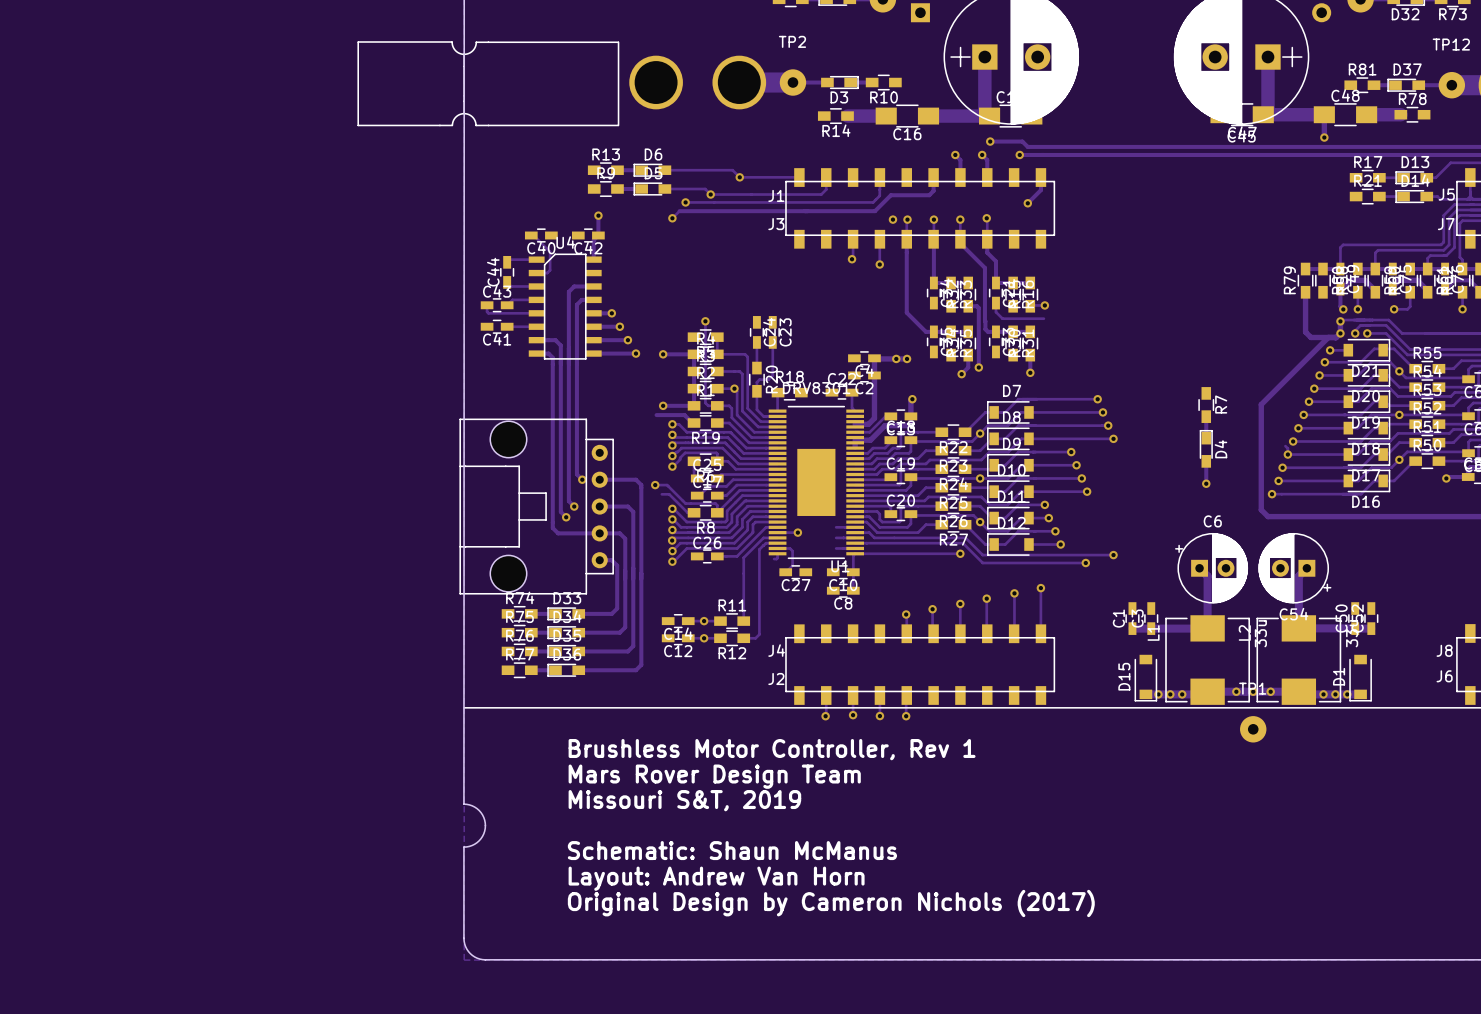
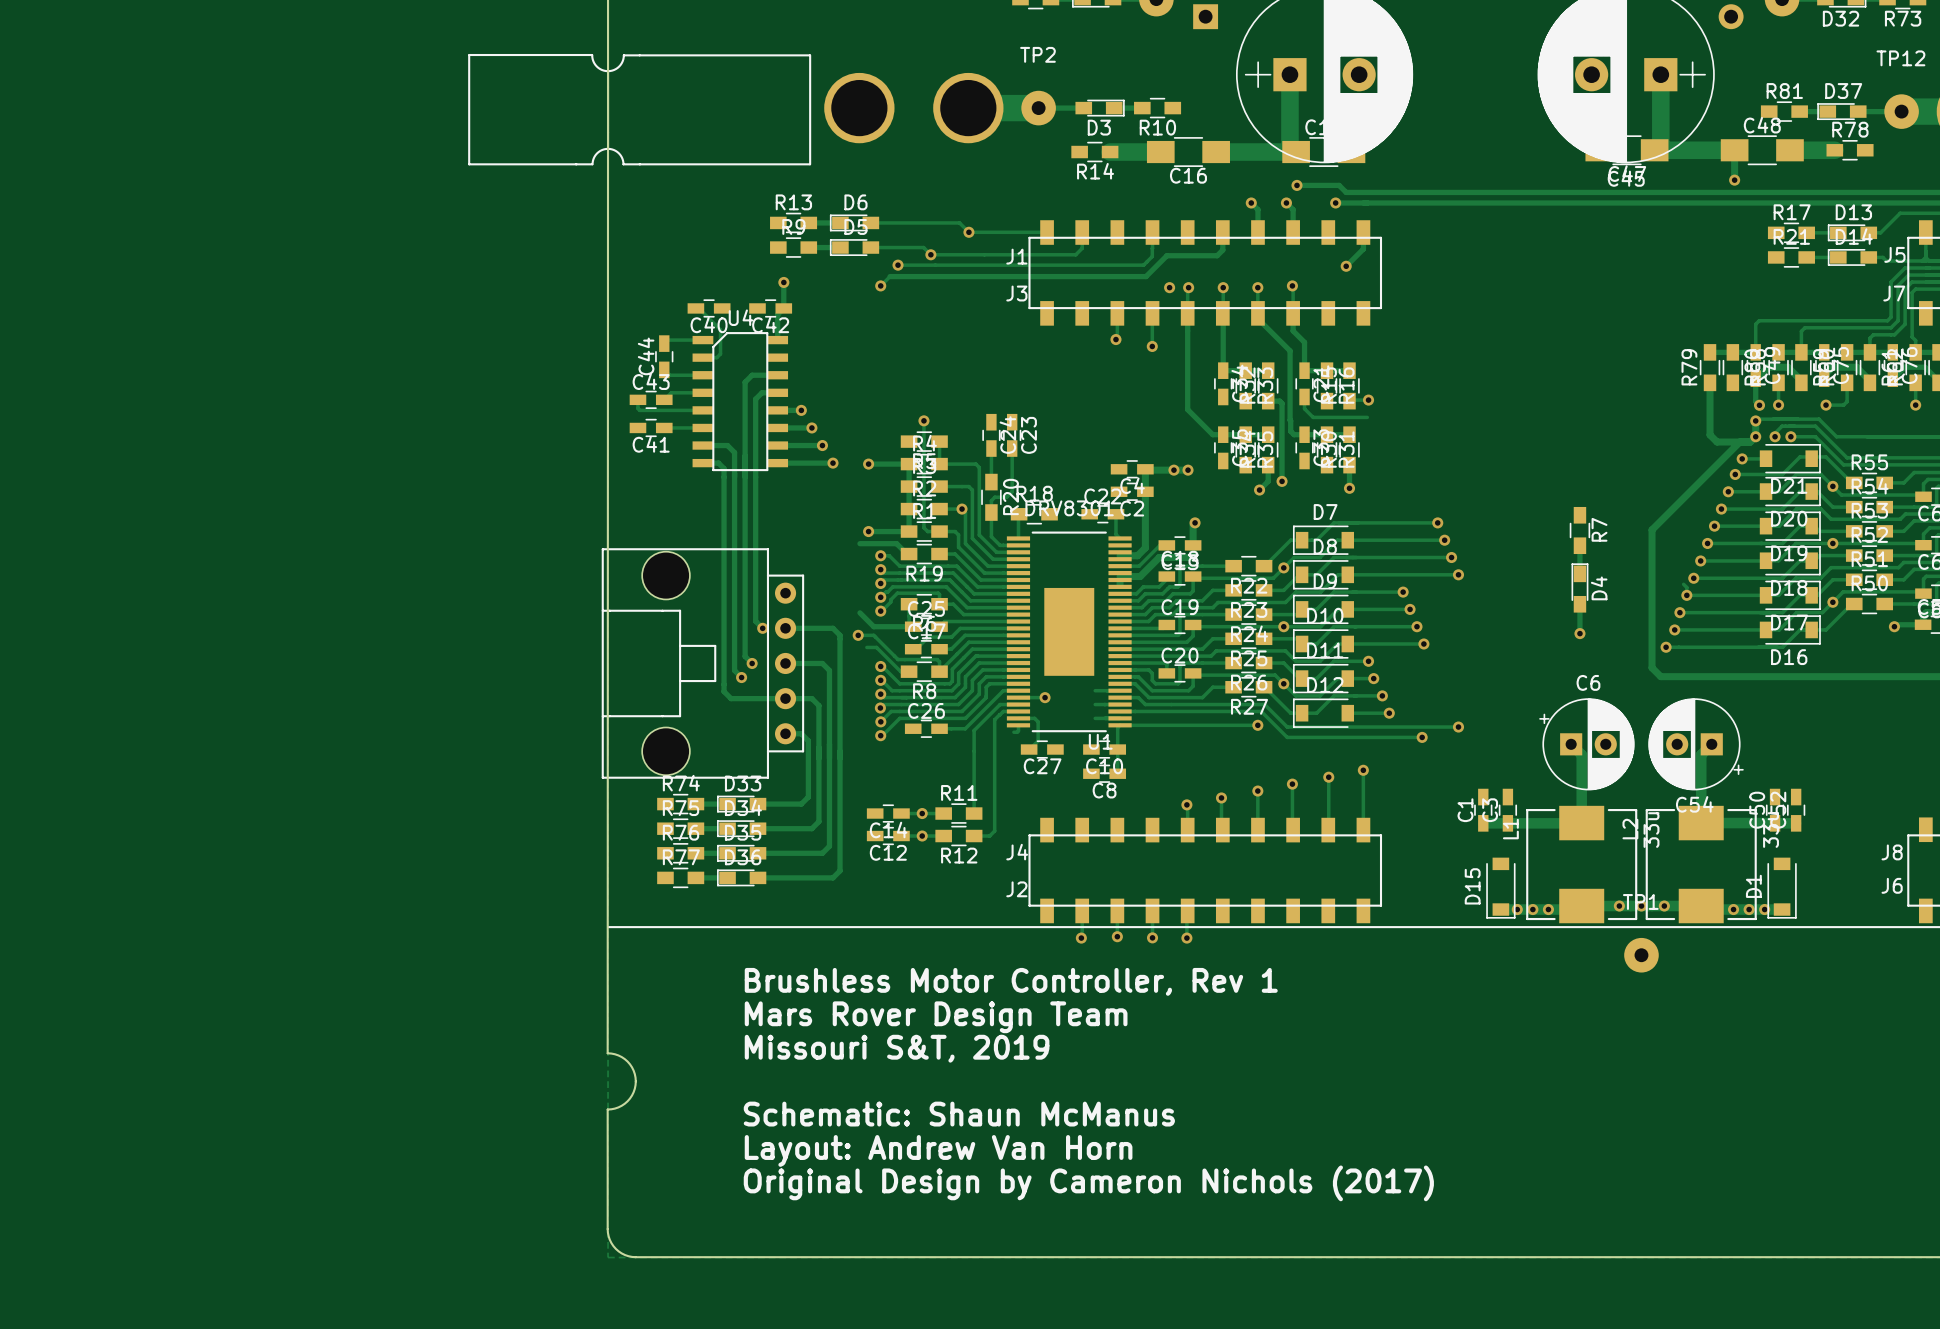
track: none -> (859, 612) (873, 626) (913, 626)

